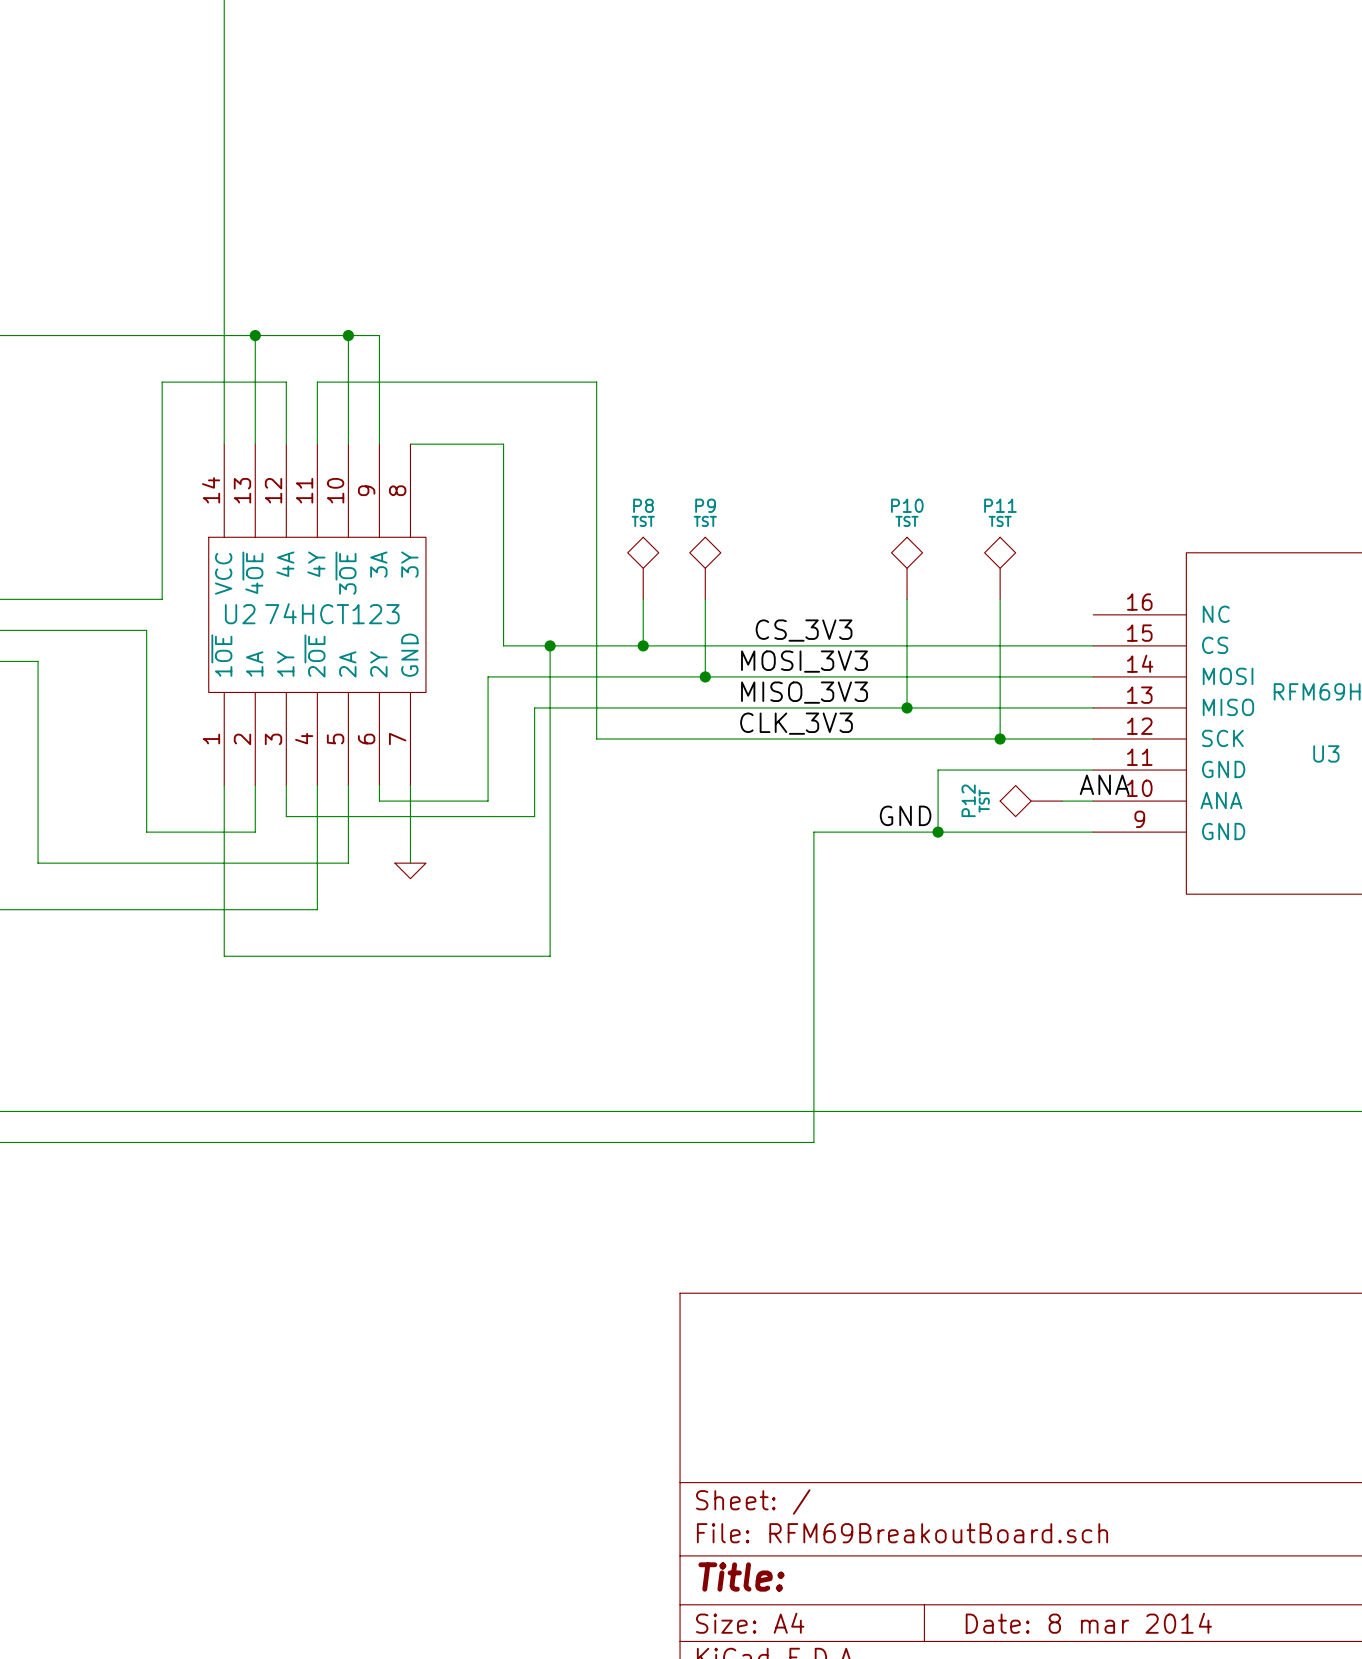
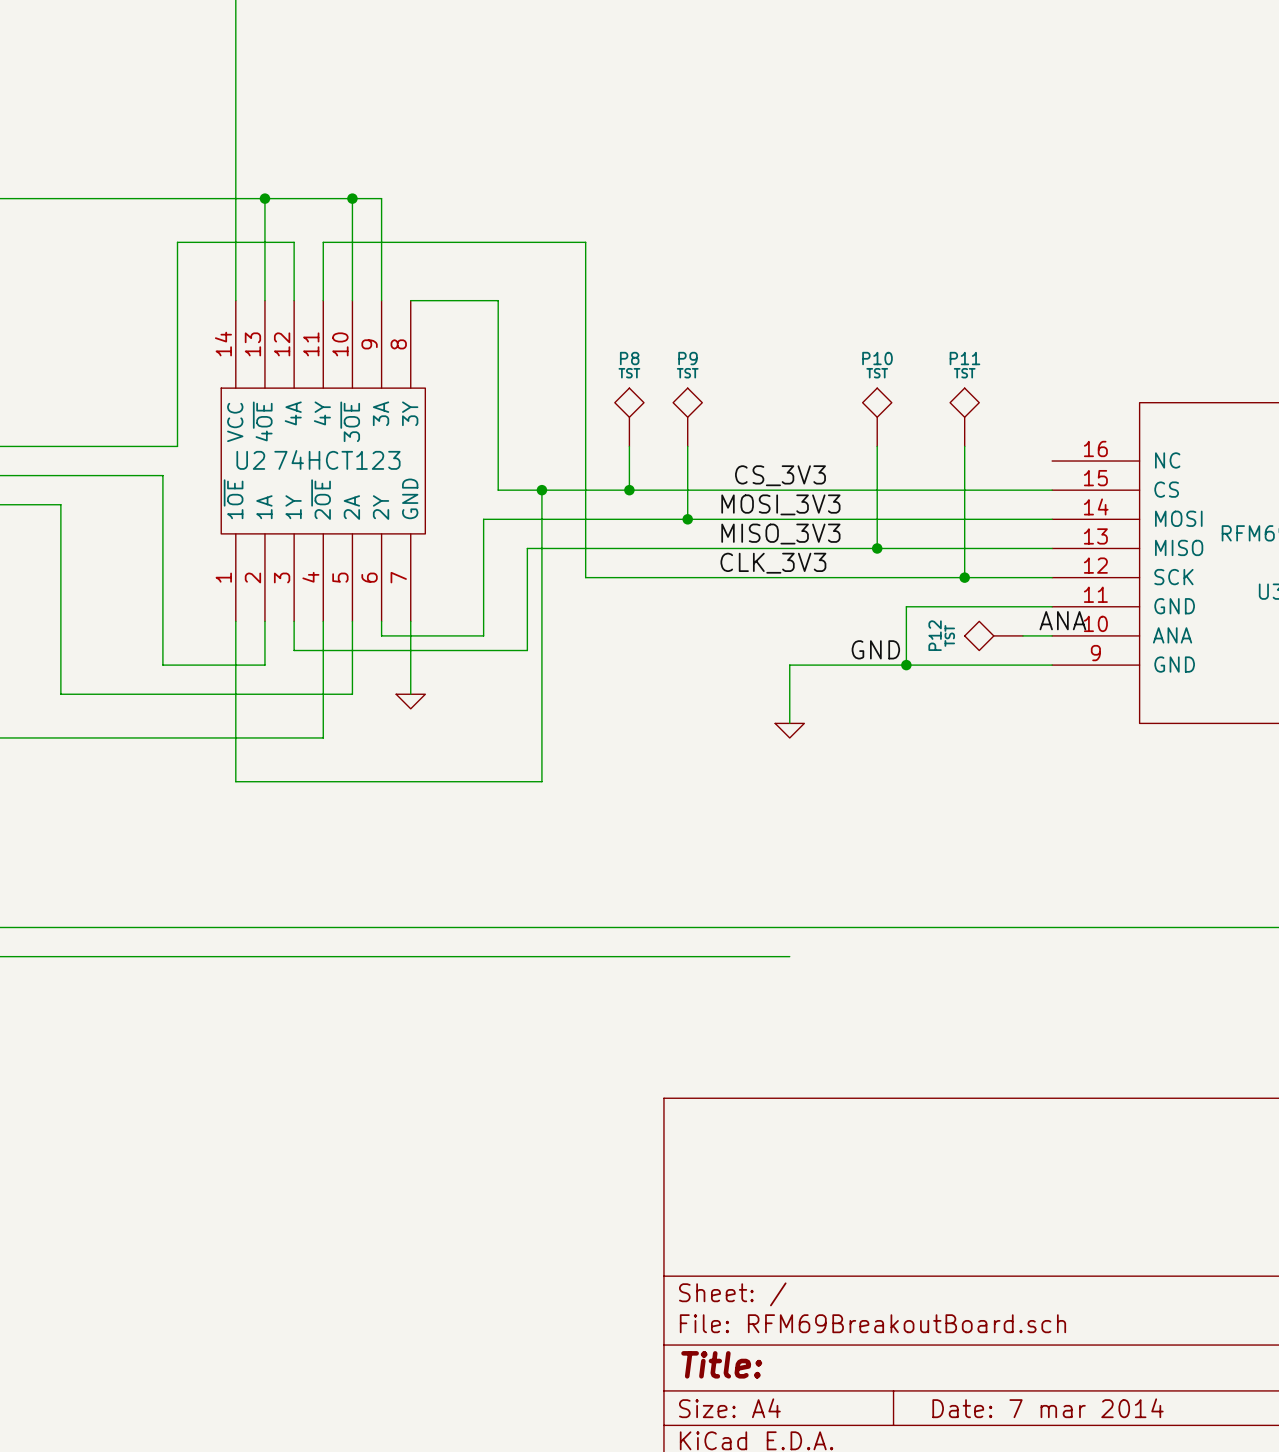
wire: (813, 894) (813, 1142) -> none
power symbol: none -> (789, 730)
title block: Date: 8 mar 2014 (1088, 1623) -> Date: 7 mar 2014 (1048, 1408)

